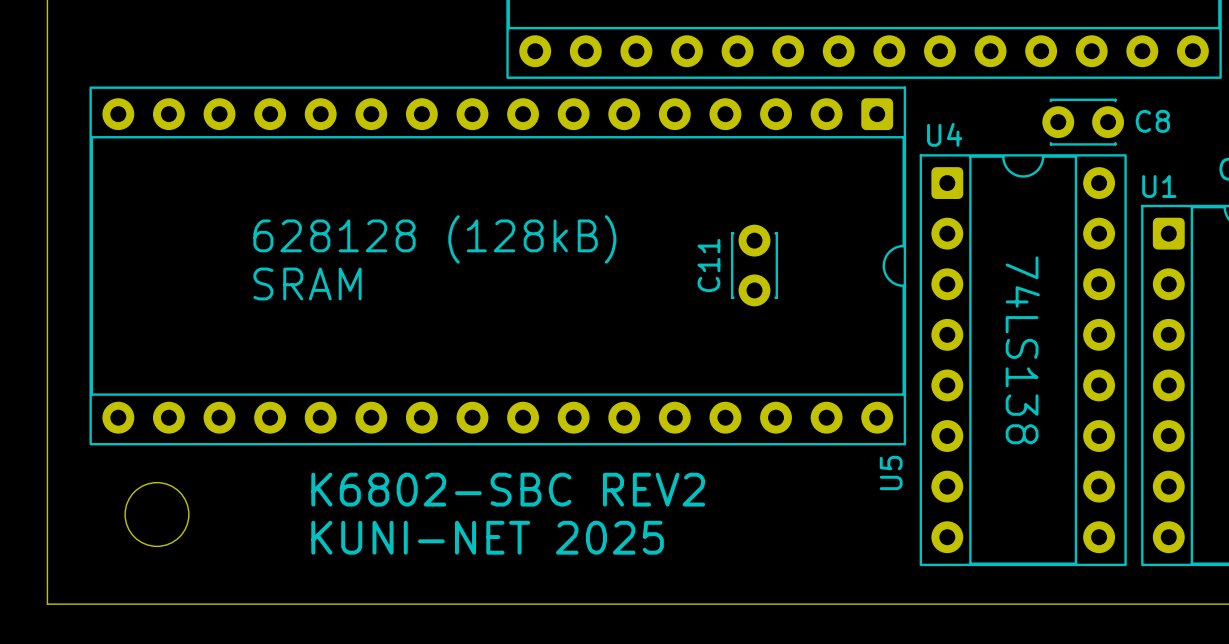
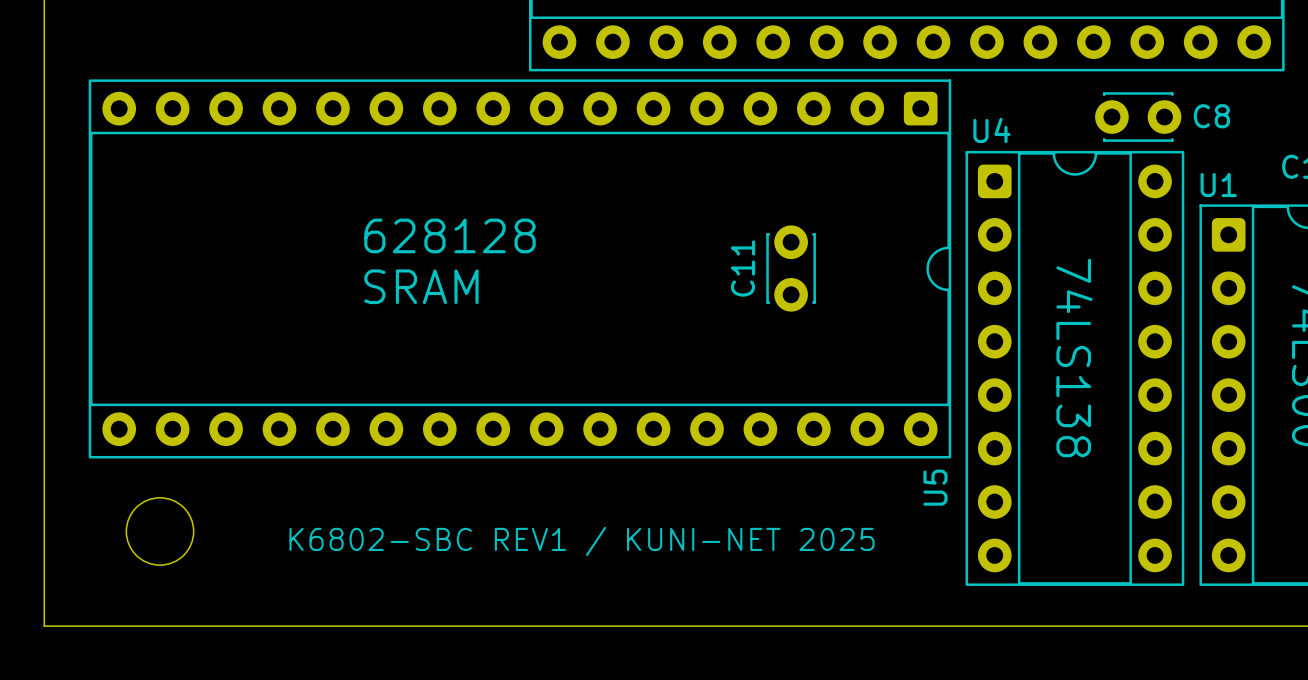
text: none -> 628128 (449, 235)
text: 628128 (128kB) (434, 239) -> none
text position: SRAM (307, 283) -> SRAM (421, 286)
text: K6802-SBC REV2 (508, 489) -> none
text: none -> K6802-SBC REV1 / KUNI-NET 2025 (582, 541)
text: KUNI-NET 2025 (487, 537) -> none

